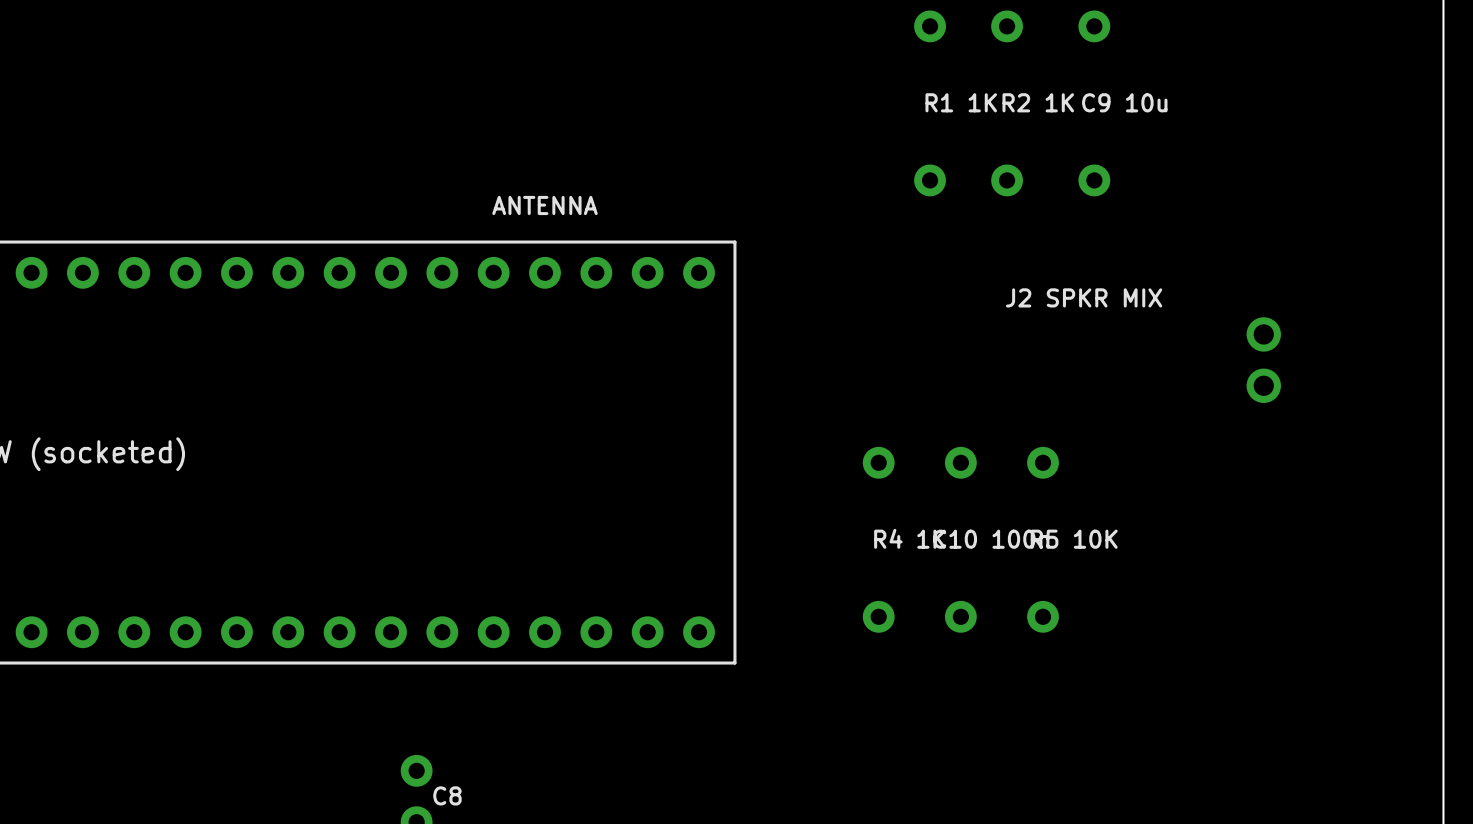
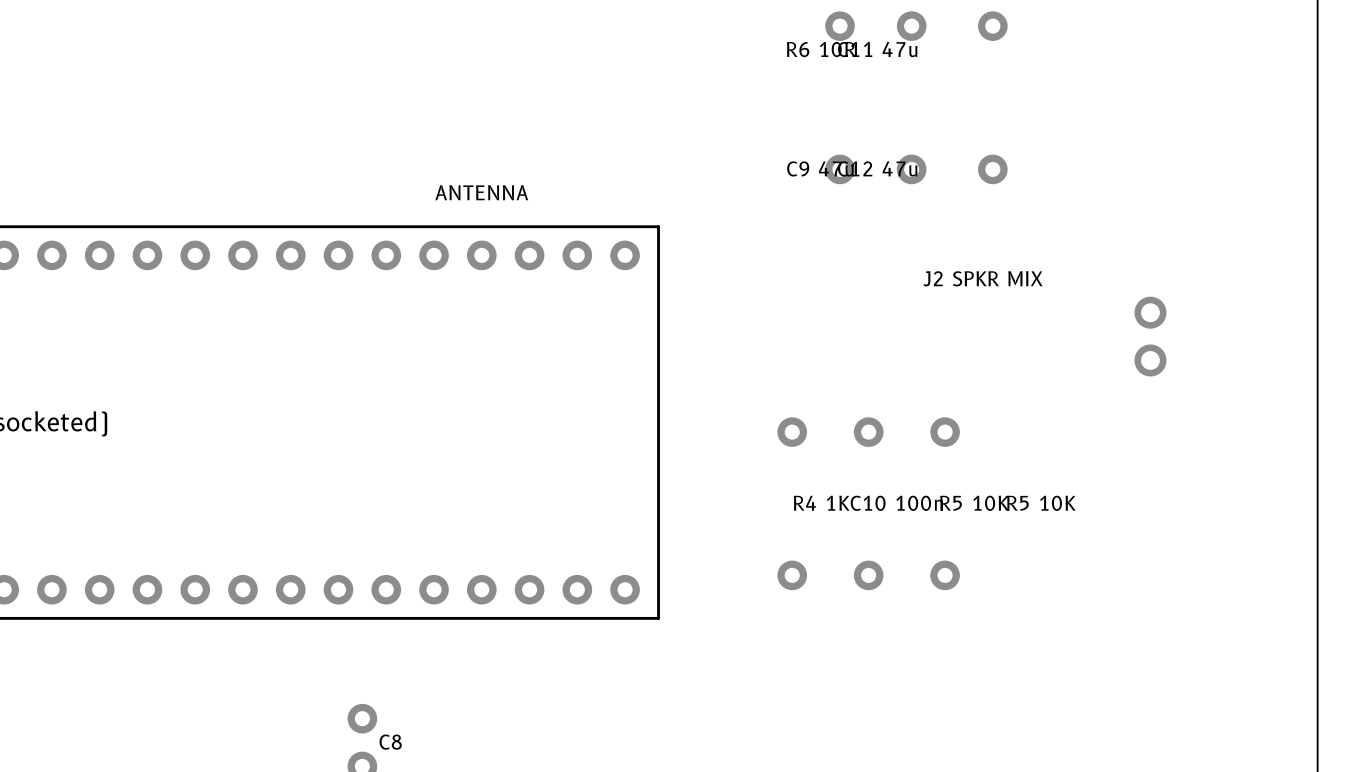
text: none -> R6 10R (821, 49)
text: none -> C11 47u (877, 49)
text: R1 1K (961, 102) -> none
text: R2 1K (1038, 102) -> none
text: C9 10u (1124, 102) -> none
text: none -> C9 47u (820, 168)
text: none -> C12 47u (877, 168)
text: none -> R5 10K (1041, 503)

